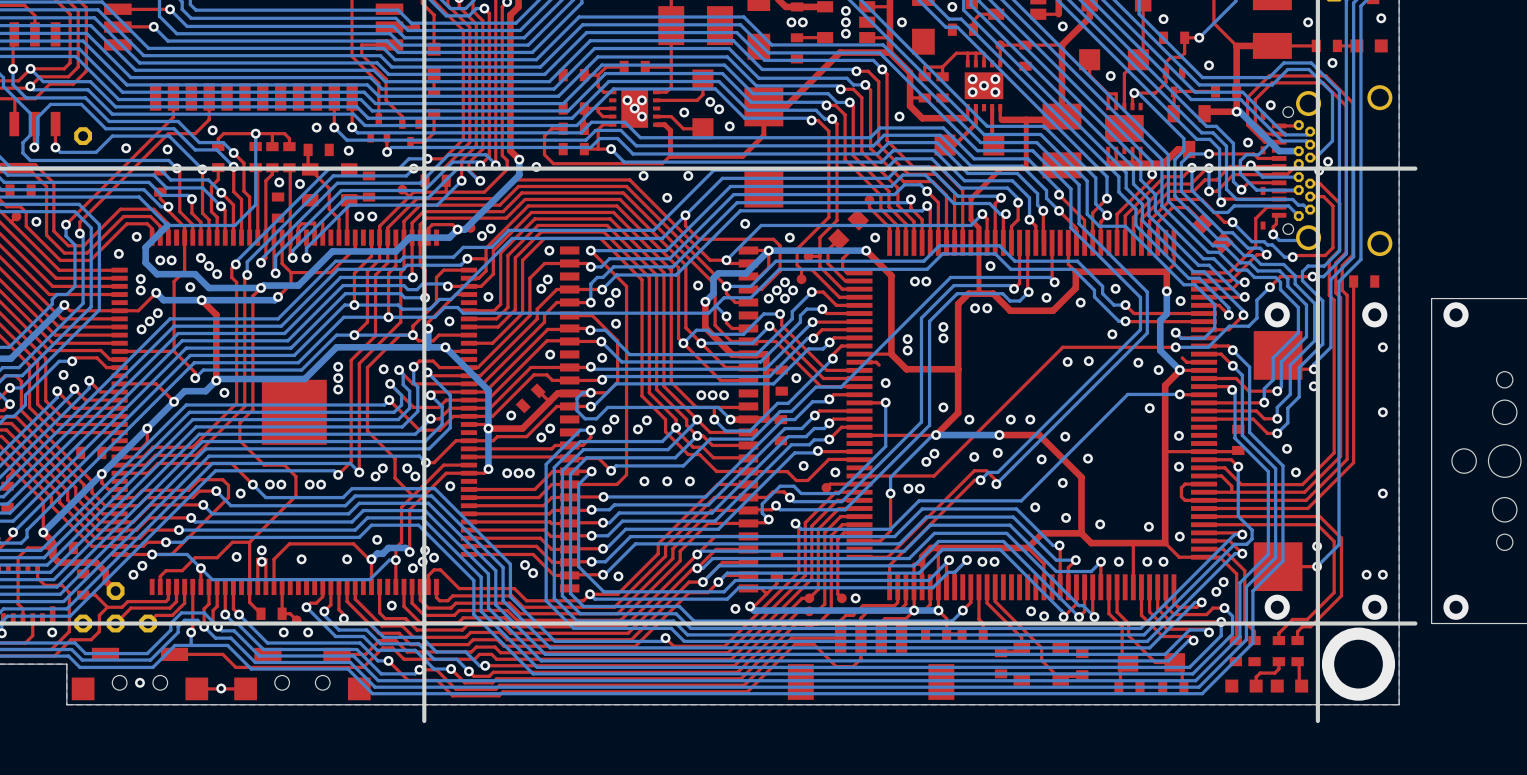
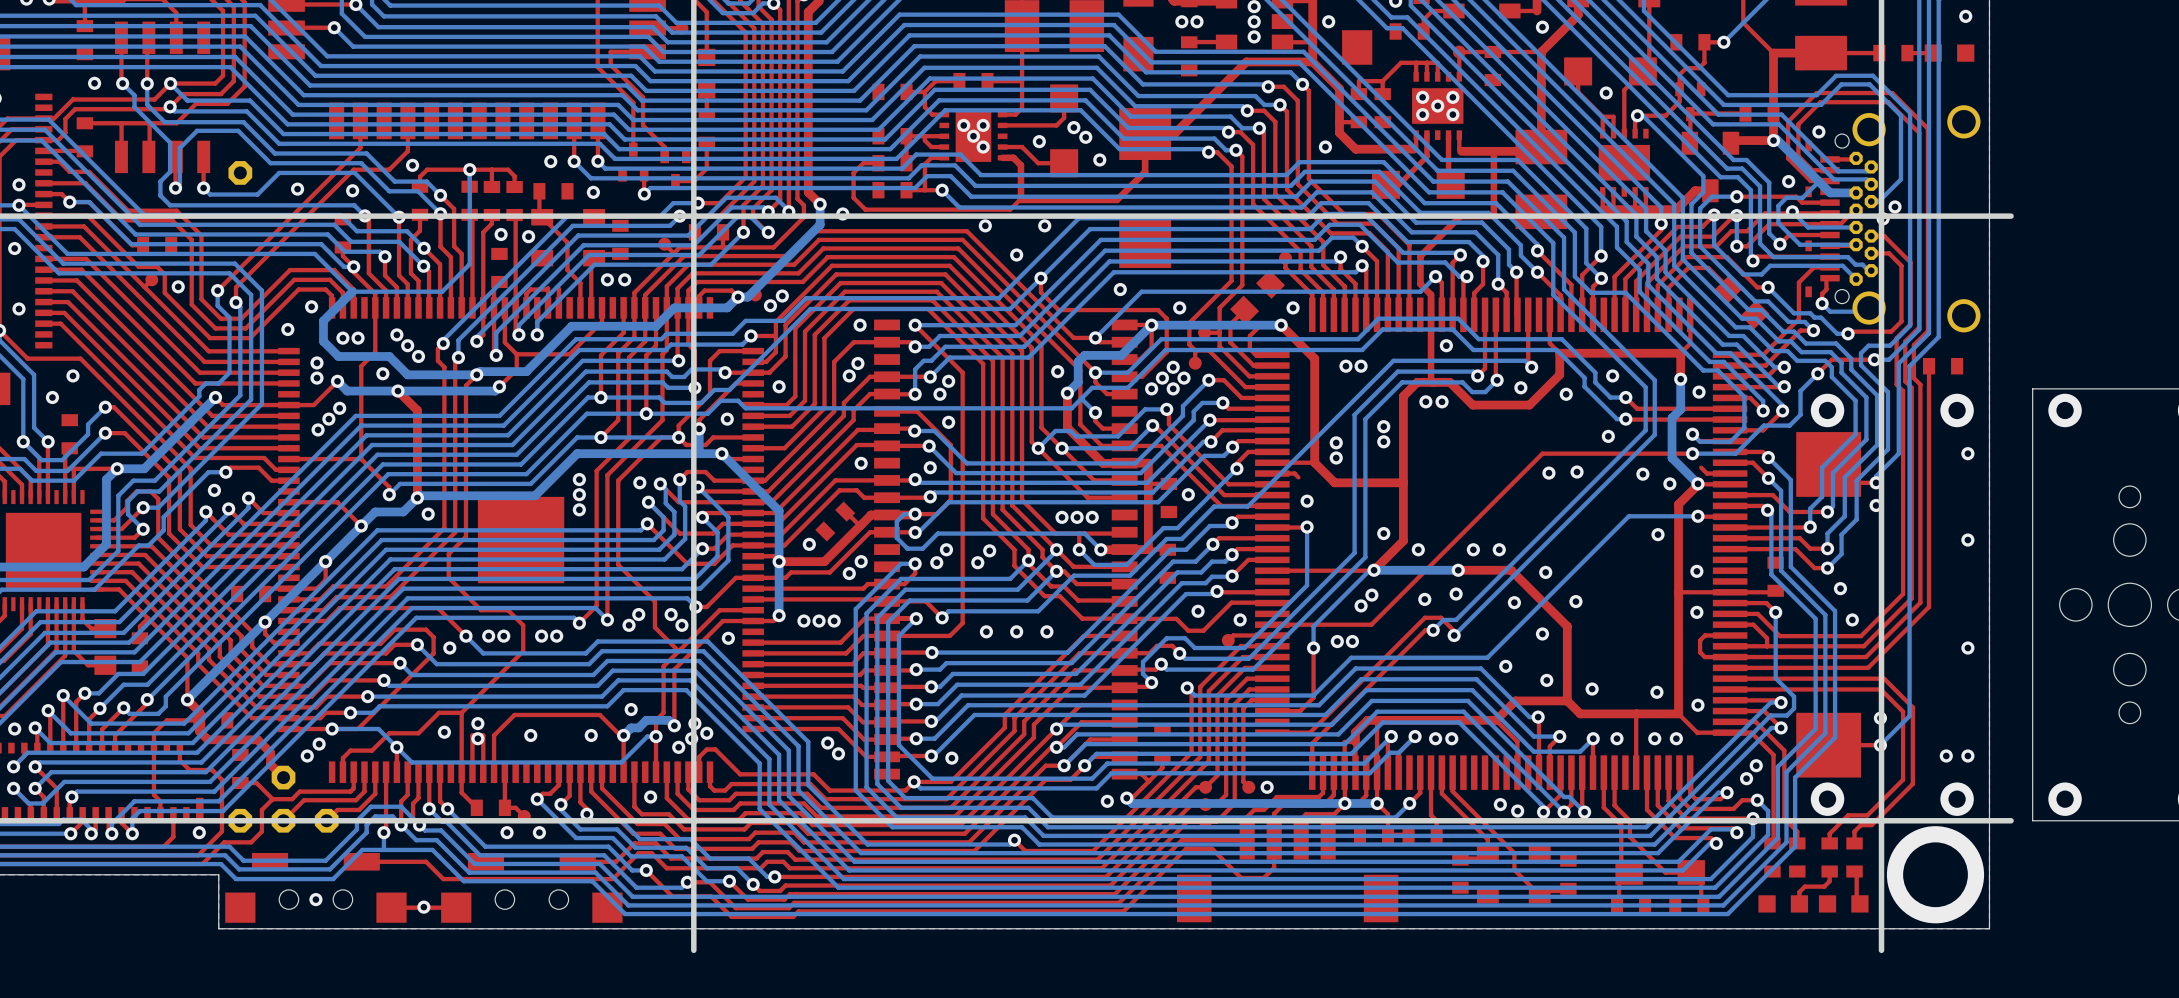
via: (1163, 19) -> none
via: (1308, 22) -> none
via: (1332, 62) -> none
via: (1209, 65) -> none

